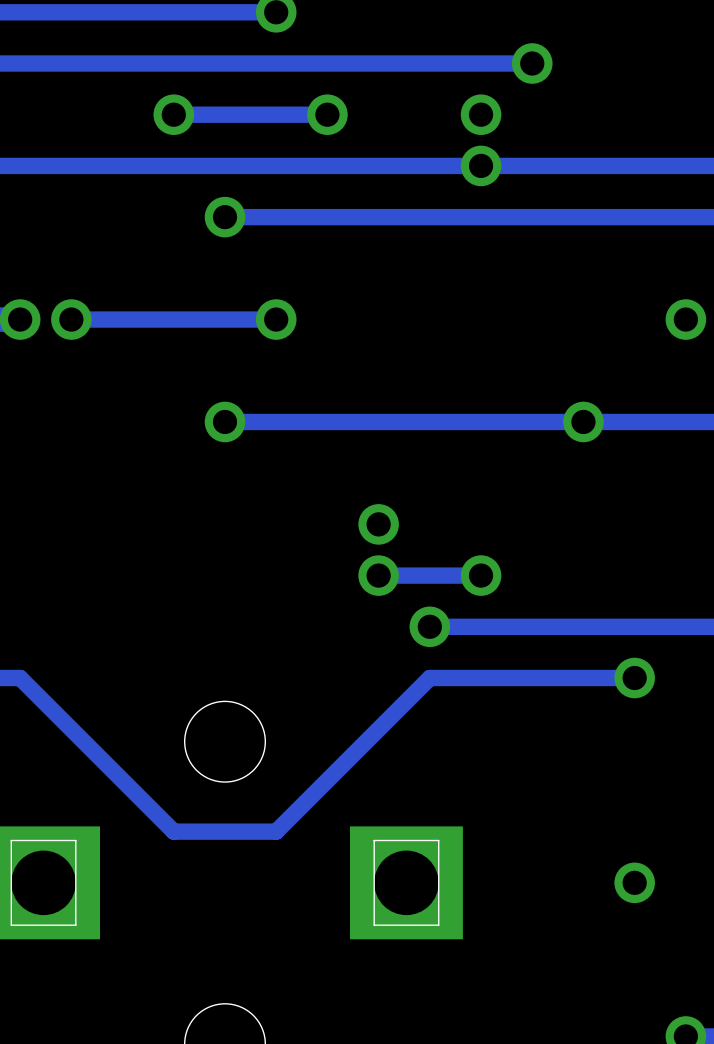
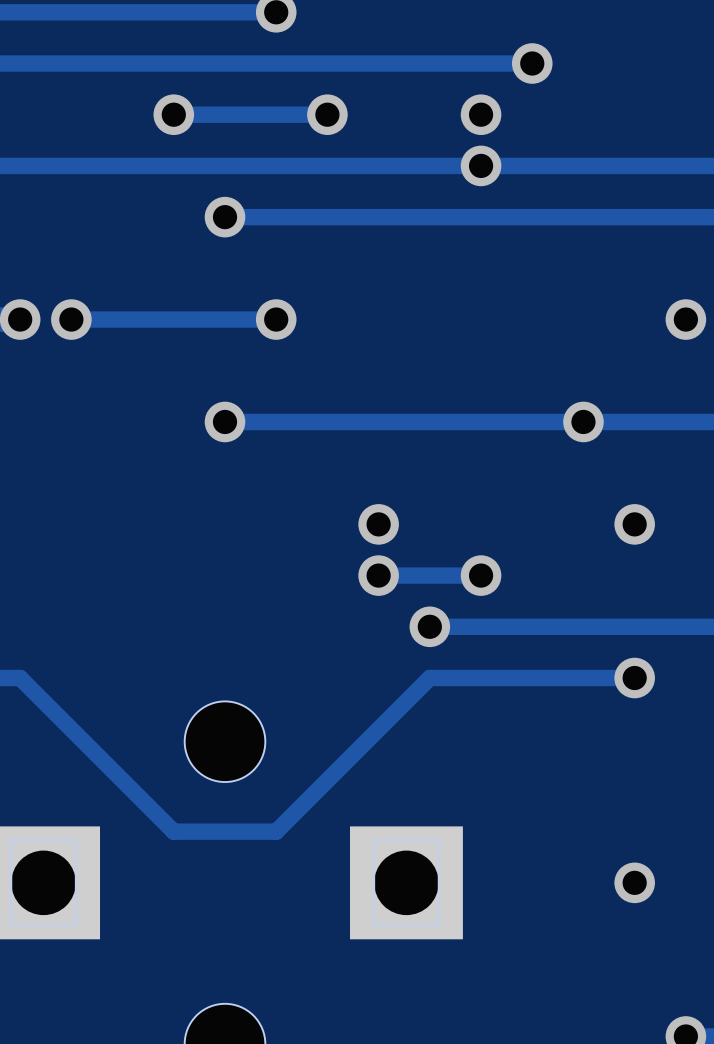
via: none -> (634, 524)

